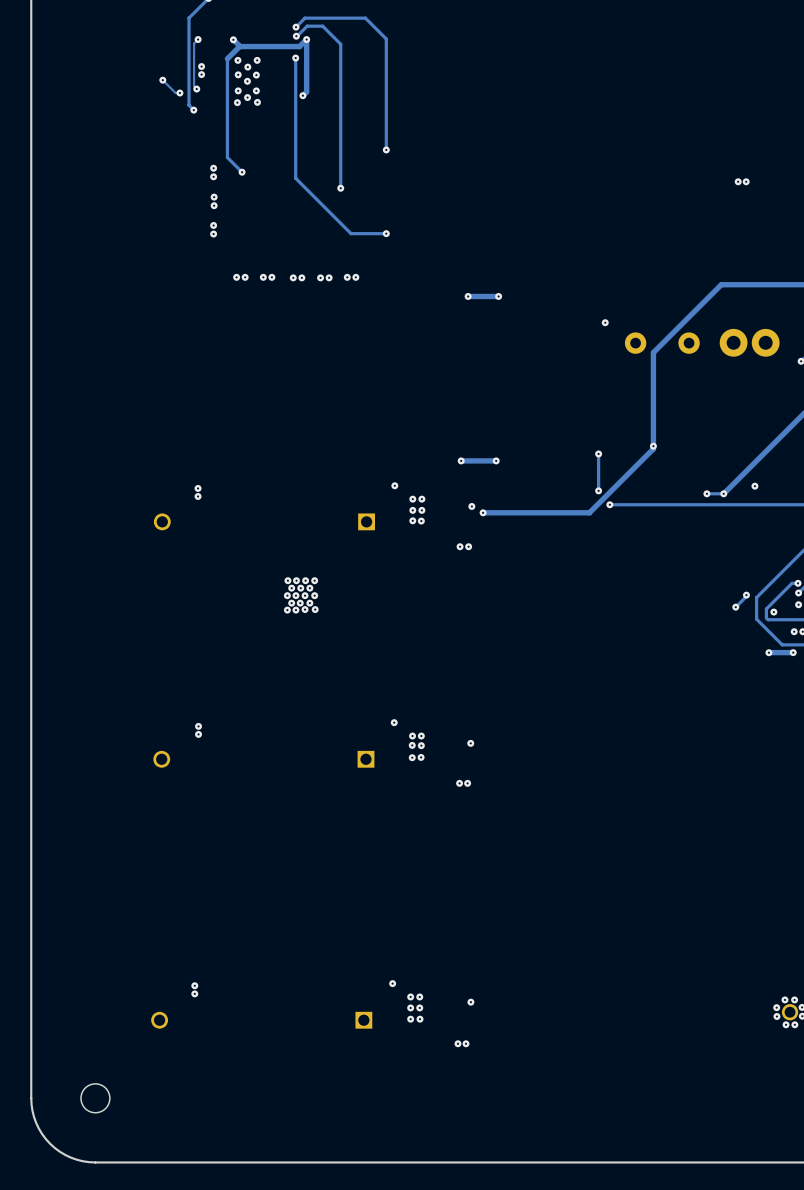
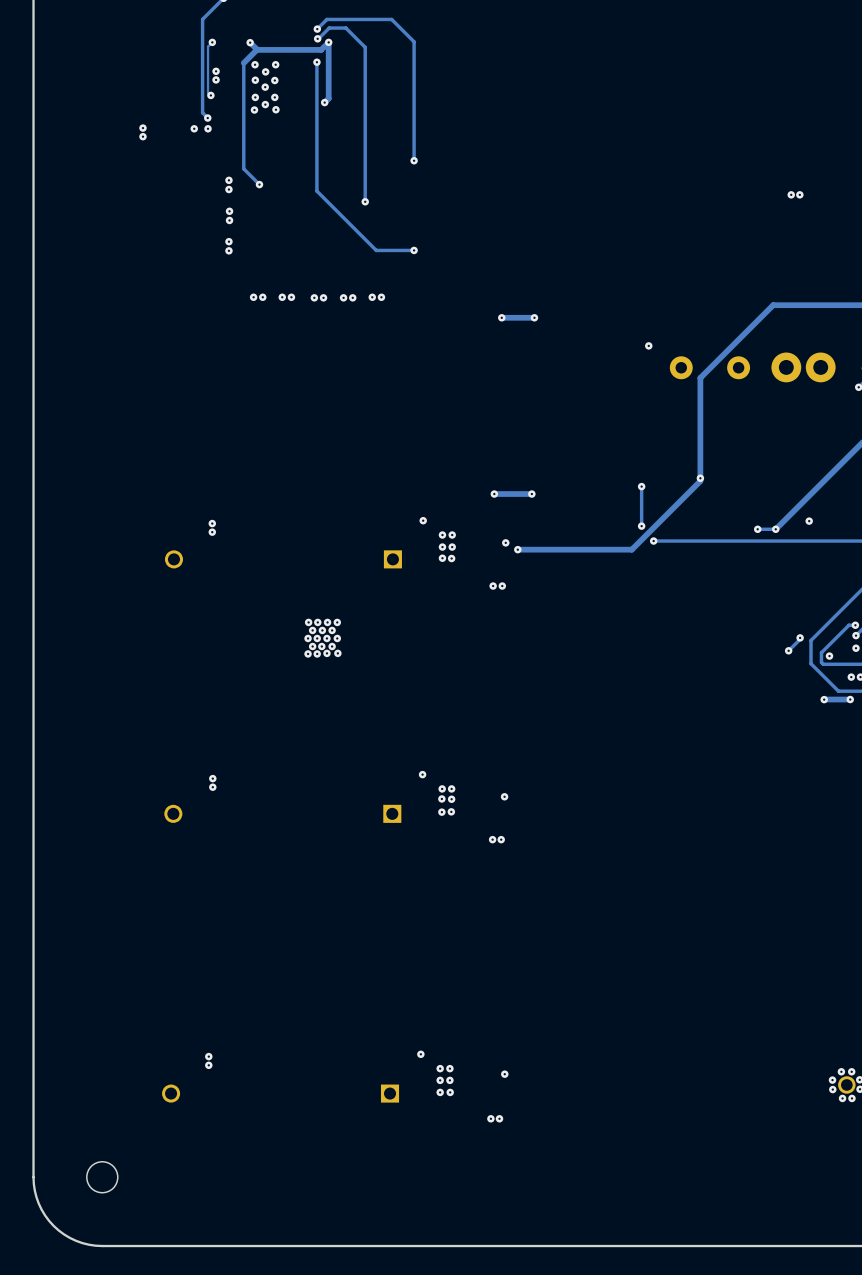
track: (162, 80) (175, 93) (179, 93) -> none
via: (162, 80) -> none
via: (179, 93) -> none
via: none -> (142, 128)
via: none -> (194, 128)
via: none -> (208, 128)
via: none -> (142, 136)

